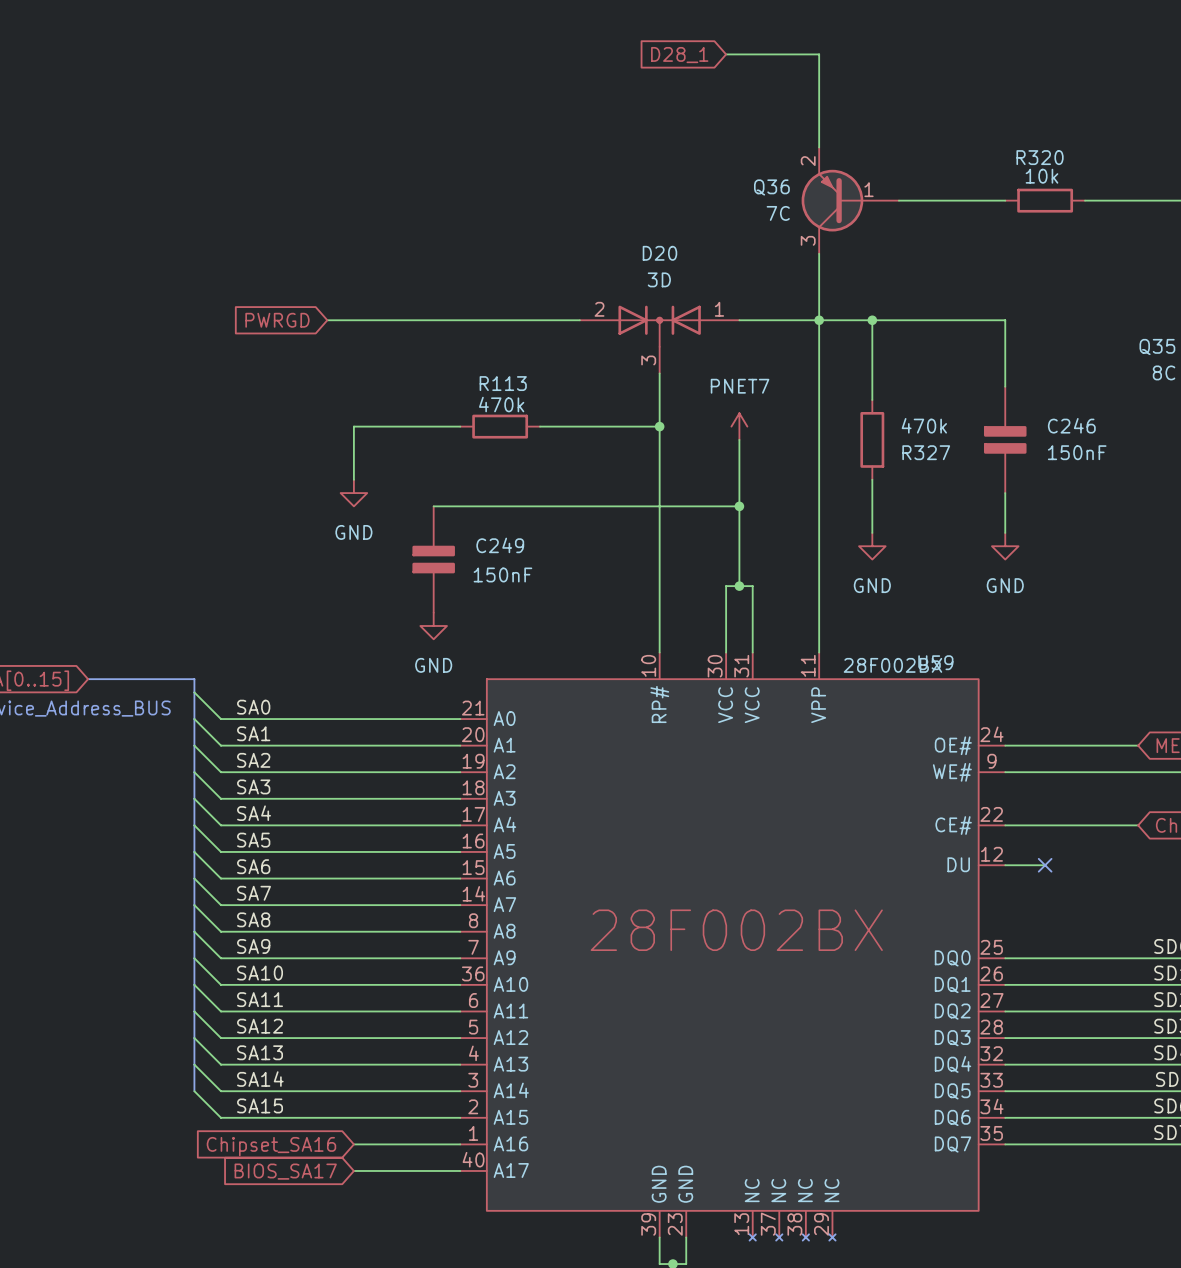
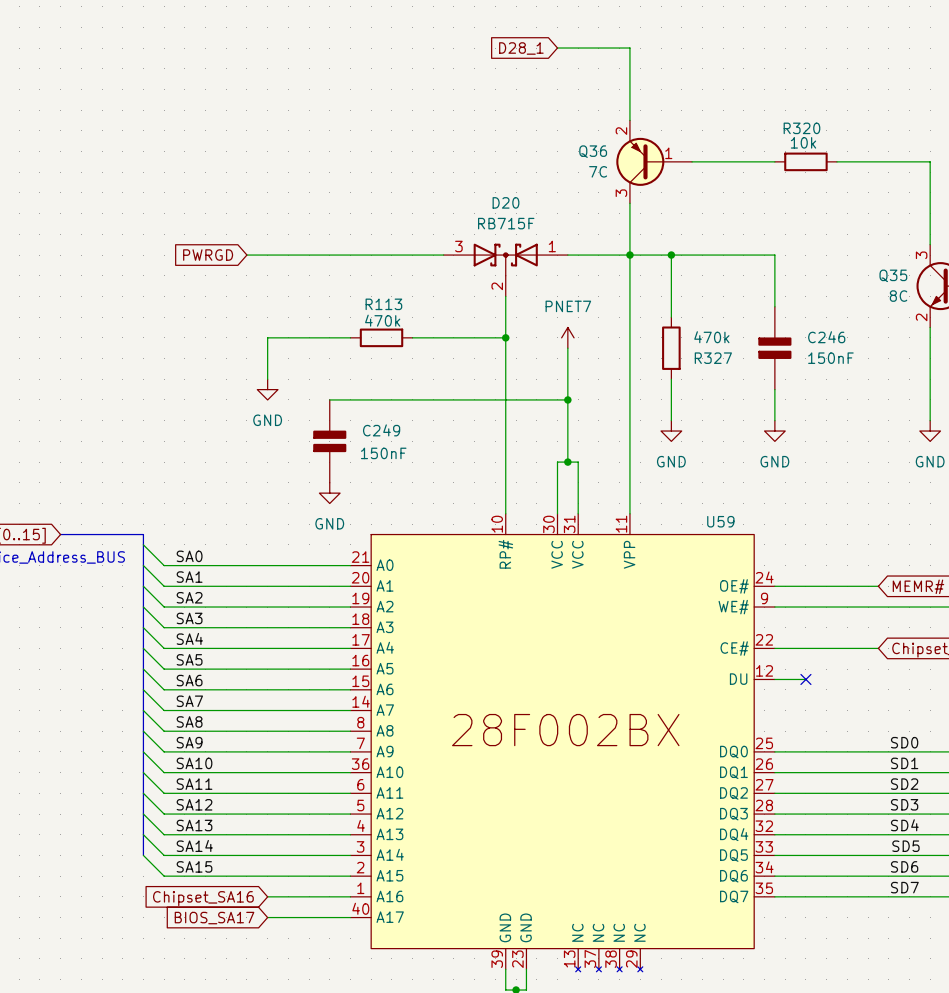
D20 value: 3D (659, 279) -> RB715F (506, 223)
D20 symbol: [579, 305, 740, 374] -> [443, 243, 568, 297]
U59 value: 28F002BX (892, 665) -> none

